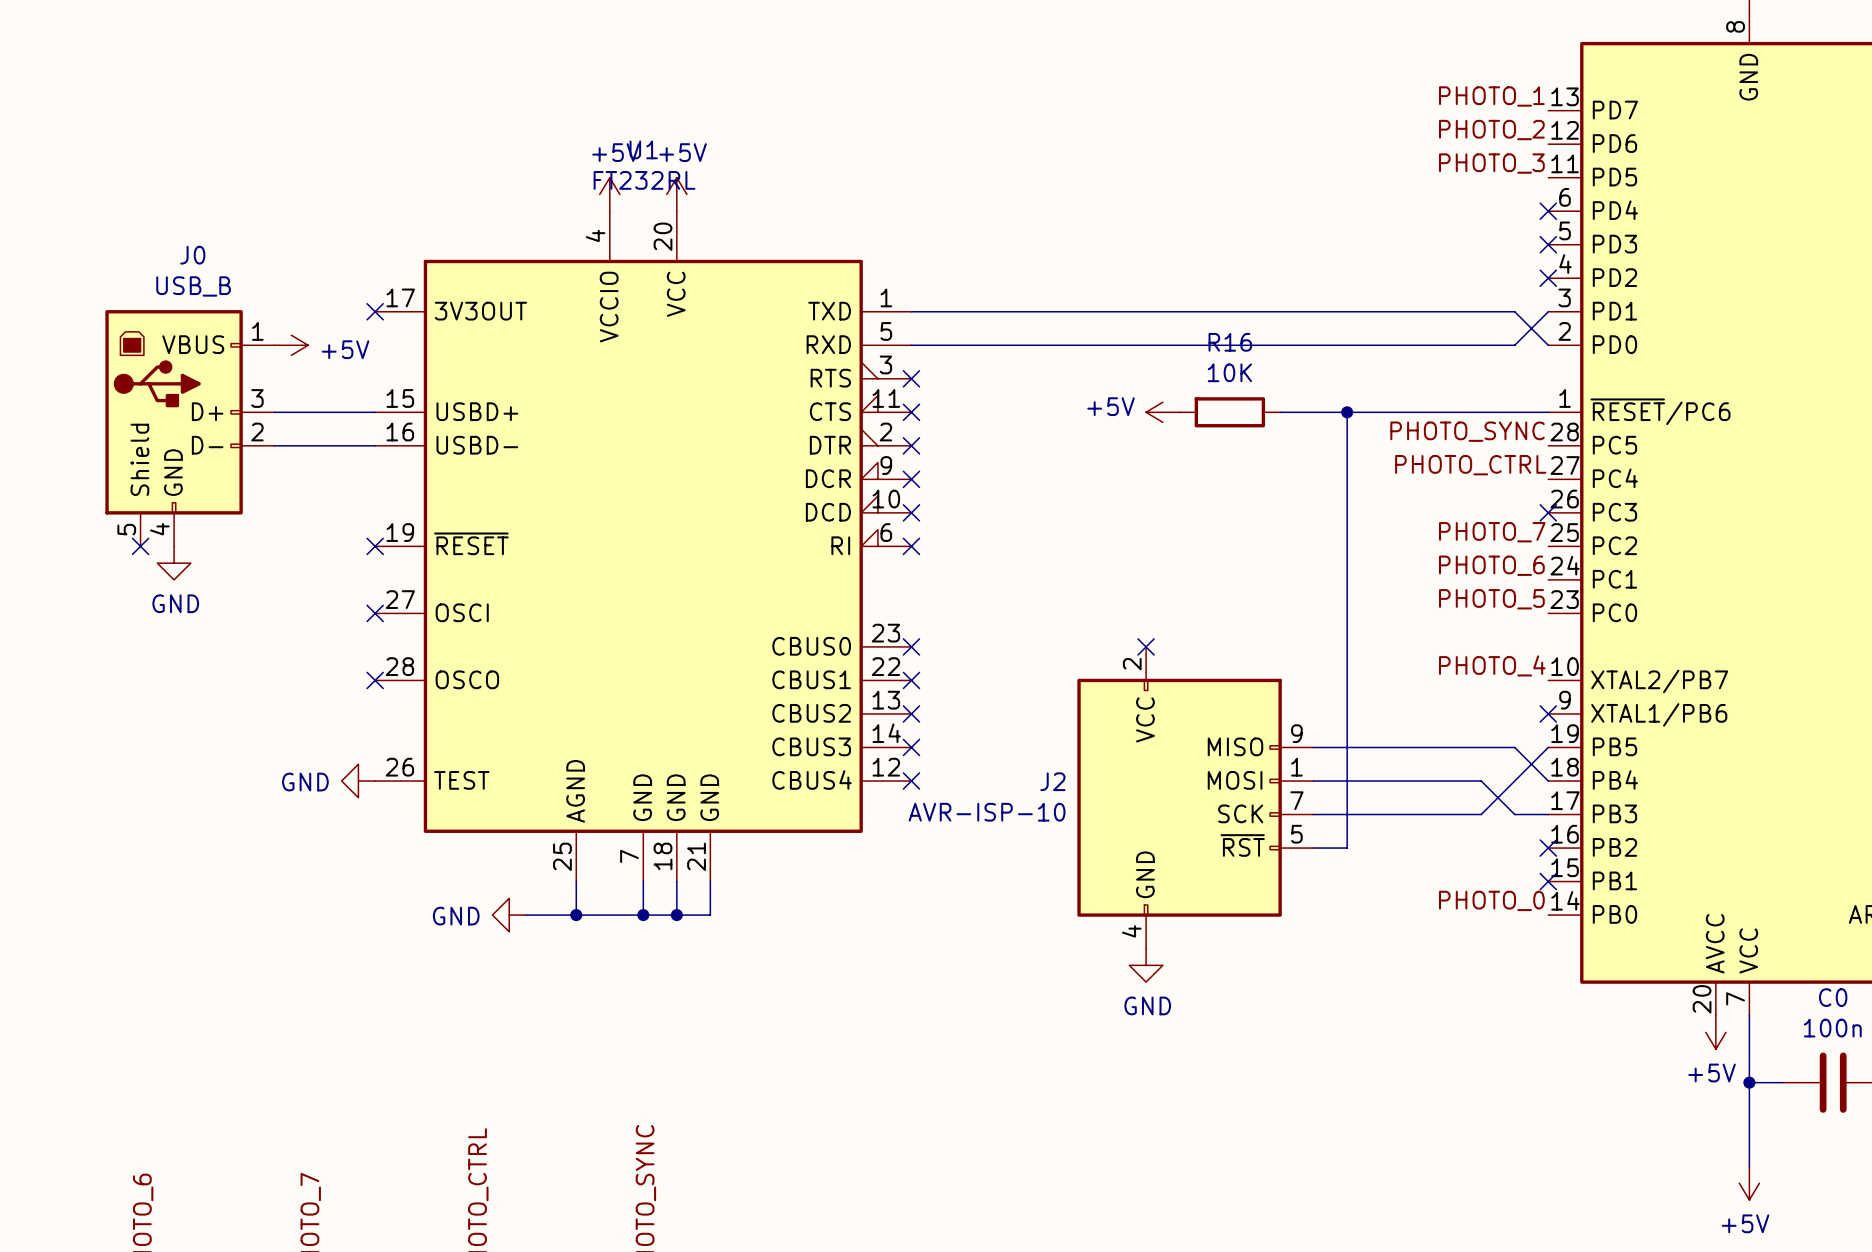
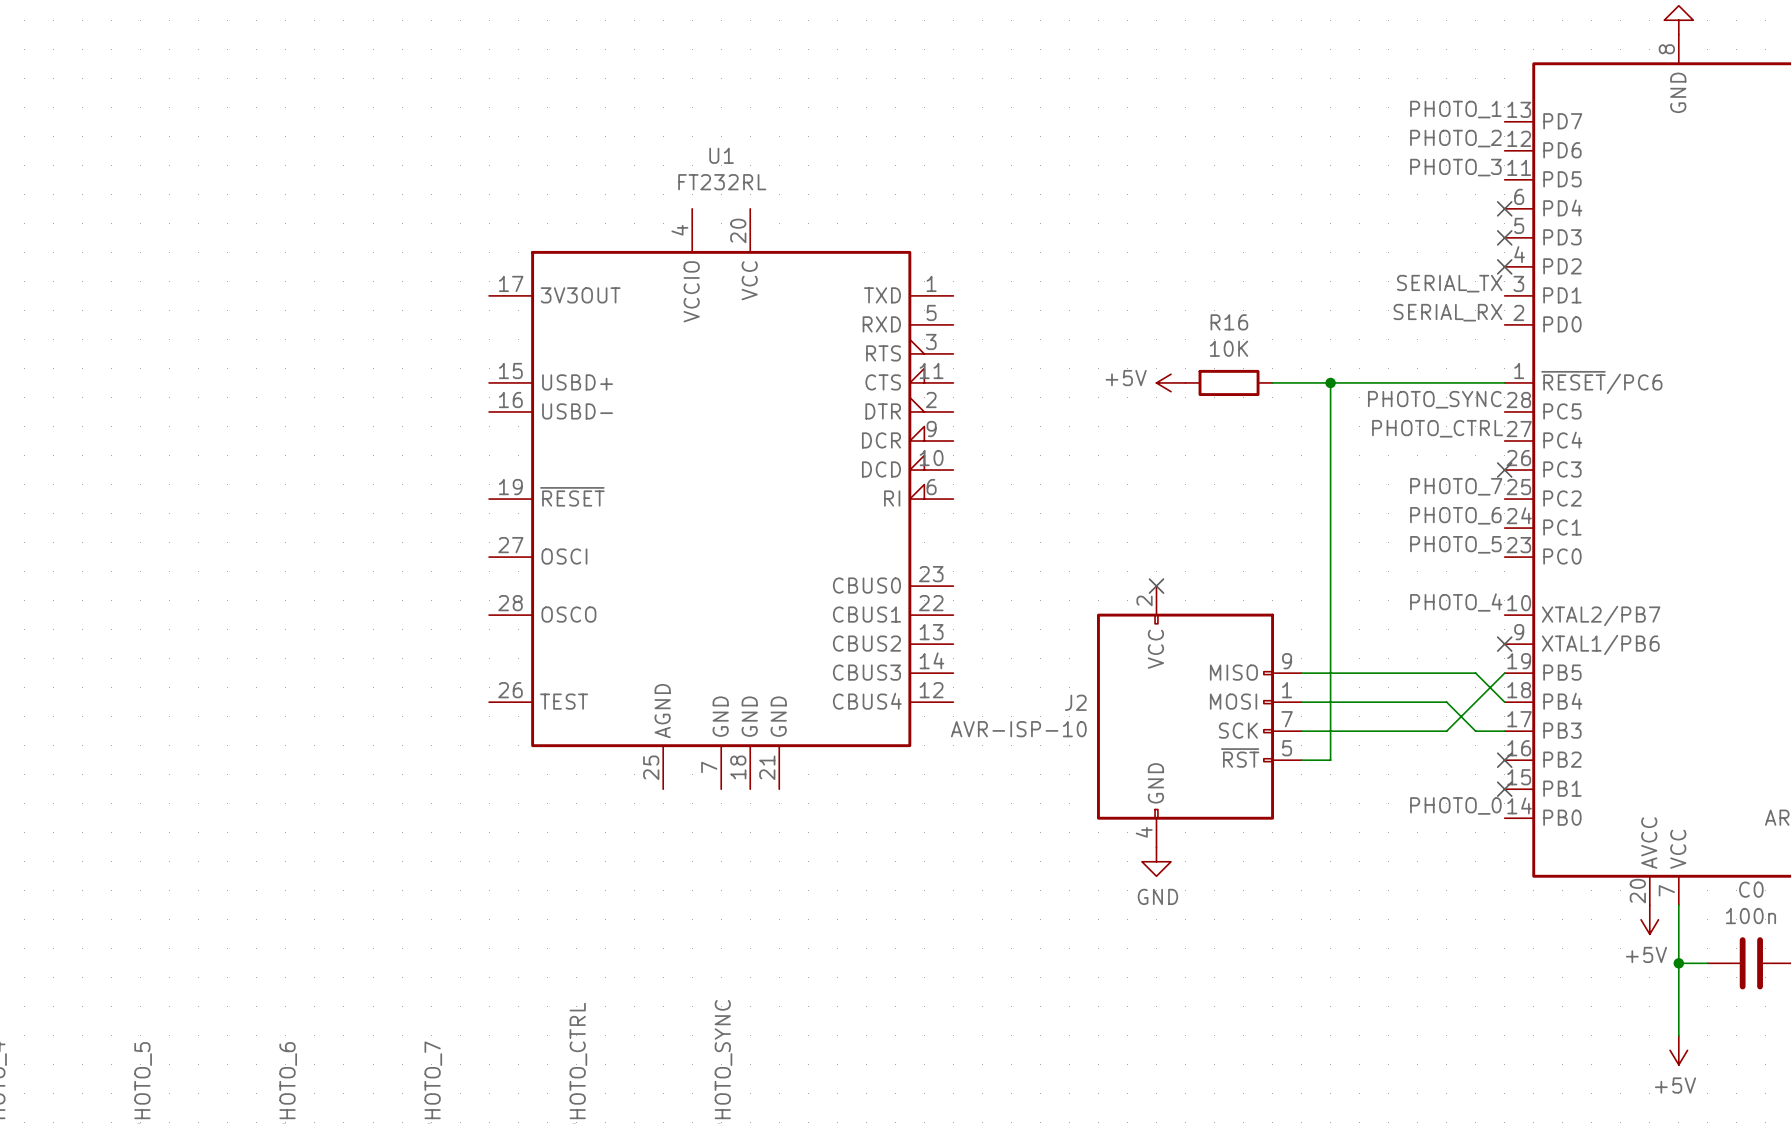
power symbol: +5V (609, 194) -> none
power symbol: +5V (676, 194) -> none
label: none -> SERIAL_TX (1449, 283)
no-connect mark: (375, 311) -> none
wire: (911, 311) (1514, 311) (1548, 345) -> none
wire: (1548, 311) (1514, 345) (911, 345) -> none
label: none -> SERIAL_RX (1447, 312)
power symbol: +5V (291, 345) -> none
no-connect mark: (911, 378) -> none
wire: (274, 412) (375, 412) -> none
no-connect mark: (911, 412) -> none
J0: USB_B (189, 428) -> none
wire: (274, 445) (375, 445) -> none
no-connect mark: (911, 445) -> none
no-connect mark: (911, 479) -> none
no-connect mark: (911, 512) -> none
no-connect mark: (140, 546) -> none
no-connect mark: (375, 546) -> none
no-connect mark: (911, 546) -> none
power symbol: GND (174, 563) -> none
no-connect mark: (375, 613) -> none
no-connect mark: (911, 646) -> none
no-connect mark: (375, 680) -> none
no-connect mark: (911, 680) -> none
no-connect mark: (911, 713) -> none
no-connect mark: (911, 747) -> none
power symbol: GND (358, 781) -> none
no-connect mark: (911, 781) -> none
wire: (576, 881) (576, 915) -> none
wire: (643, 881) (643, 915) -> none
wire: (676, 881) (676, 915) -> none
wire: (710, 881) (710, 915) (526, 915) -> none
power symbol: GND (509, 915) -> none
junction: (576, 915) -> none
junction: (643, 915) -> none
junction: (676, 915) -> none

